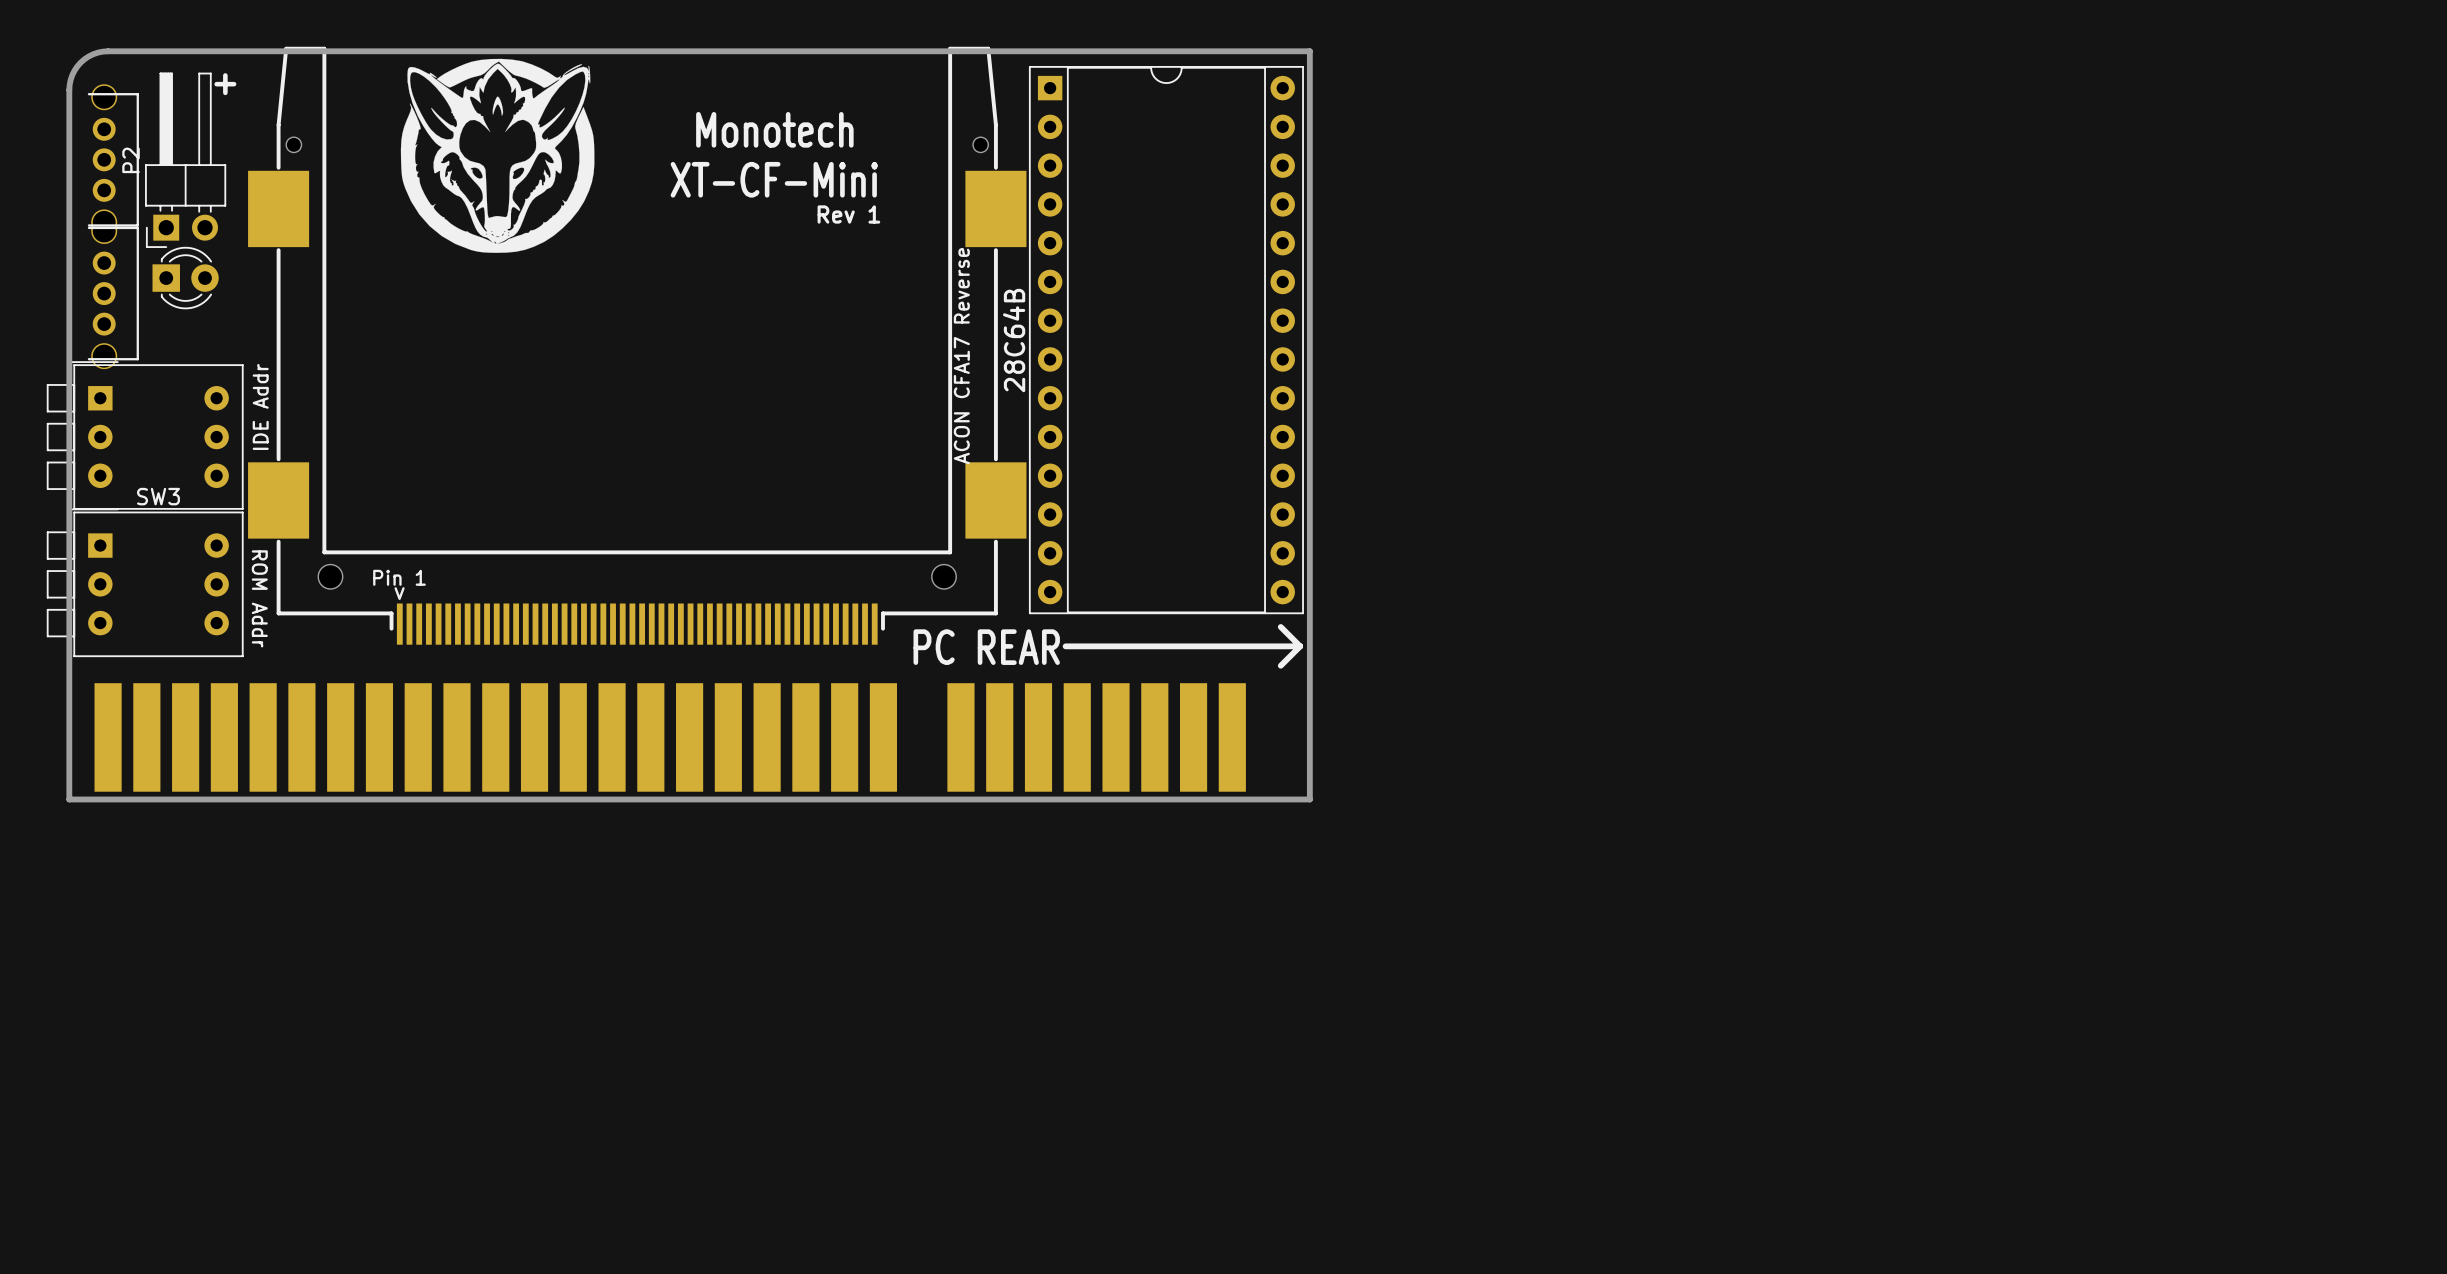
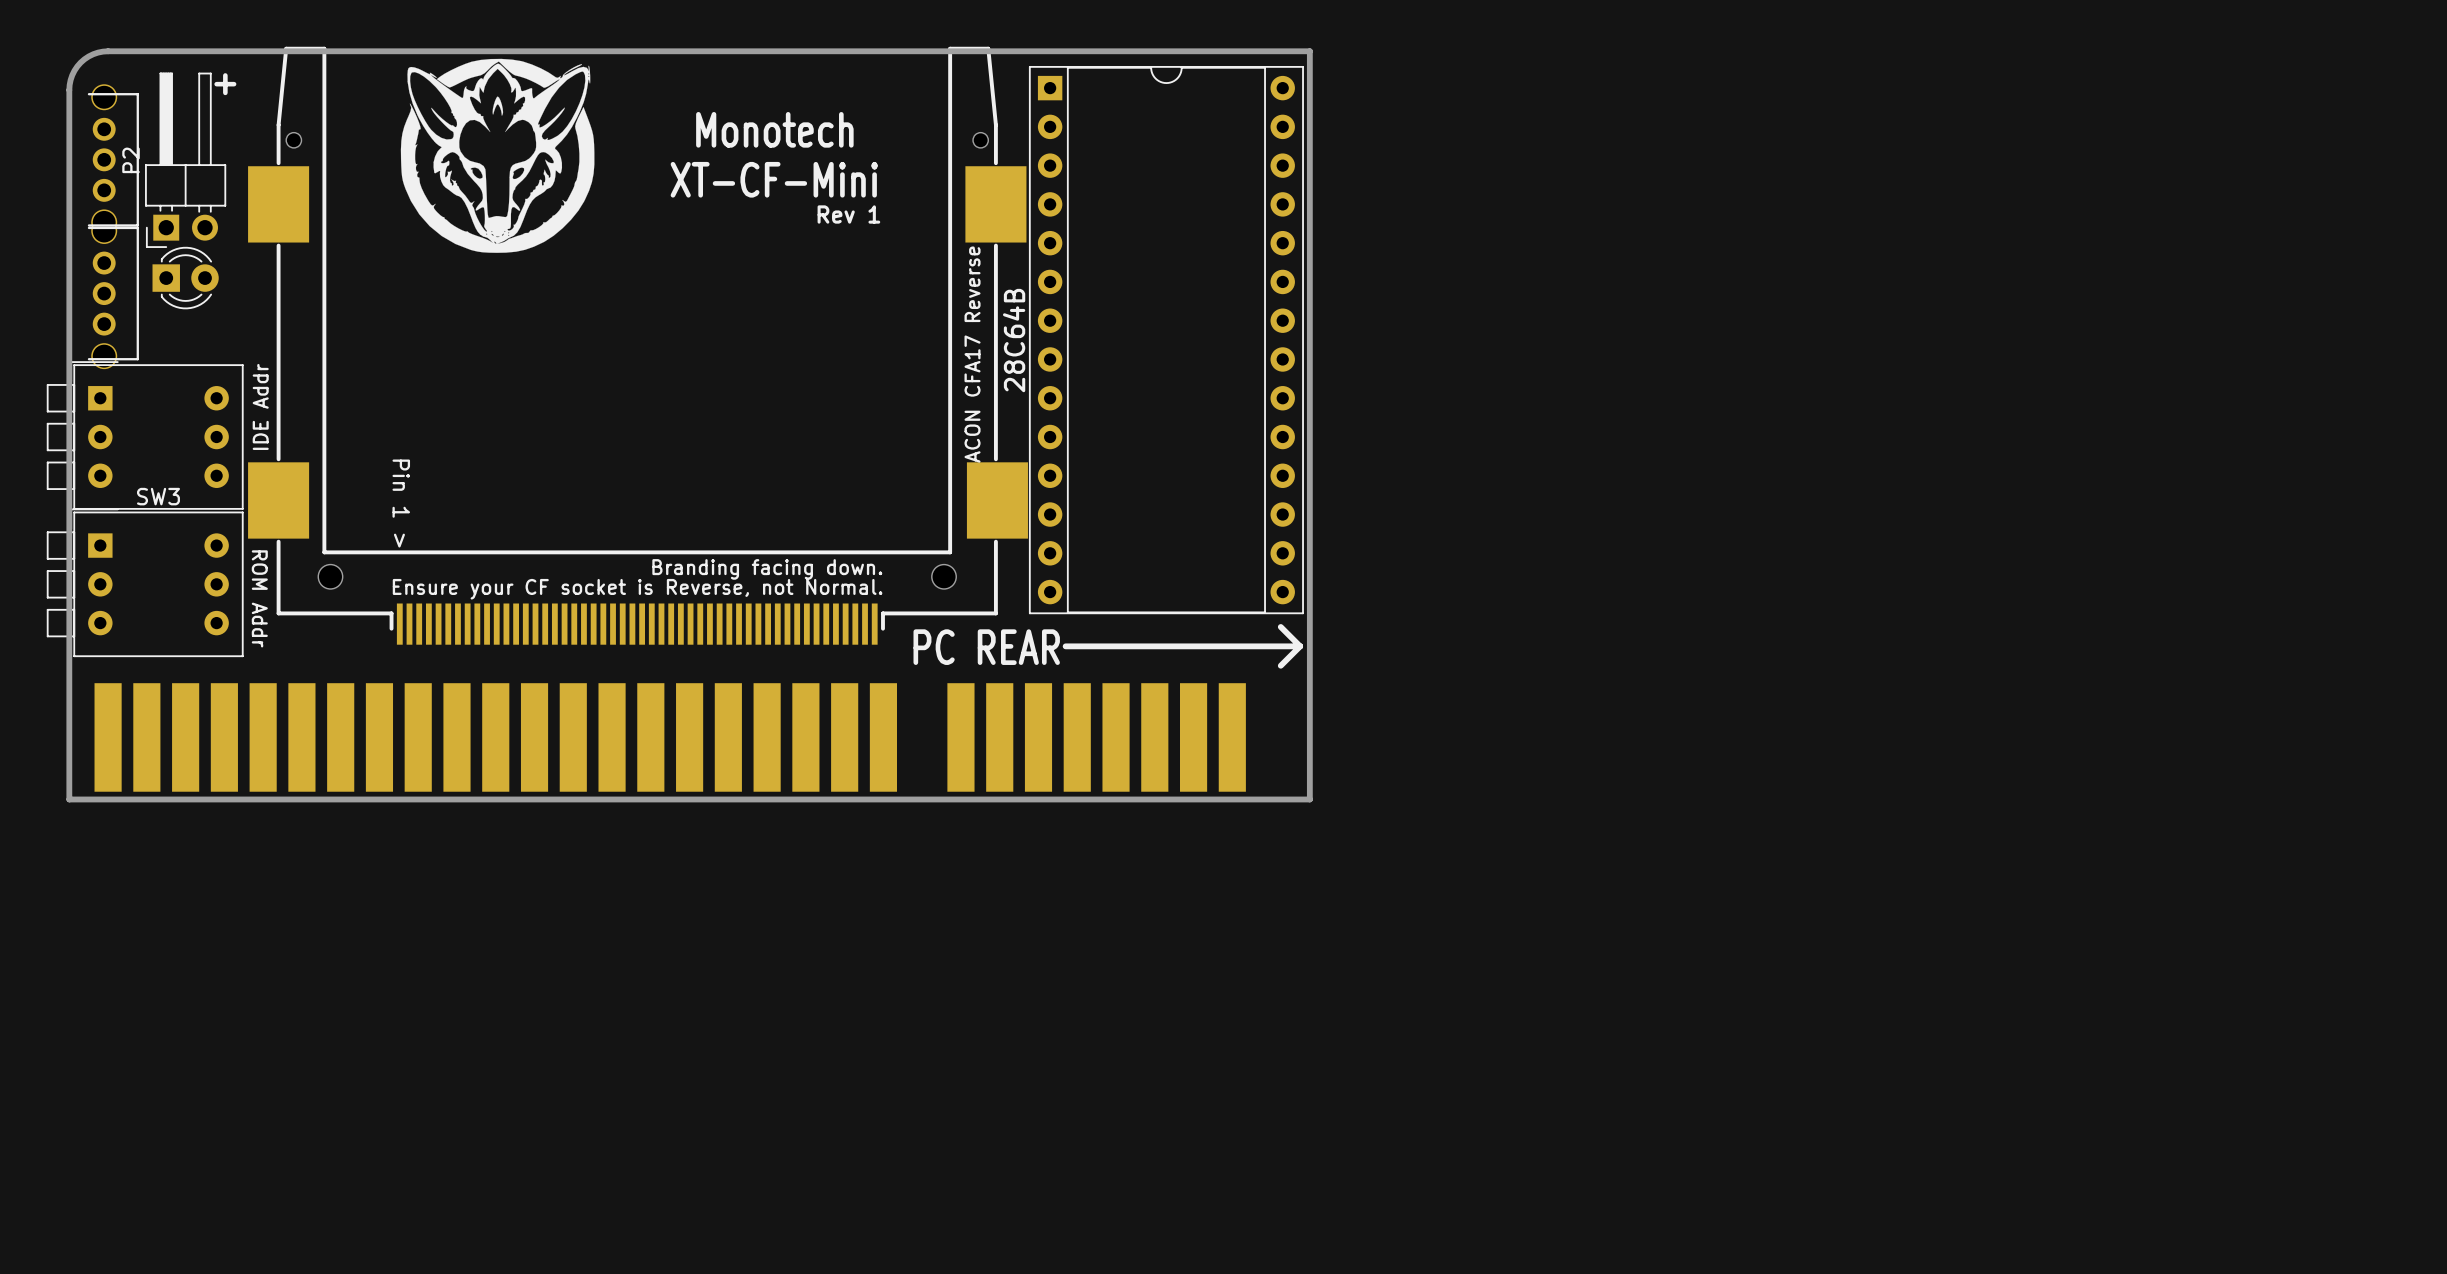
part footprint: [248, 46, 1027, 645] -> [248, 46, 1028, 645]

